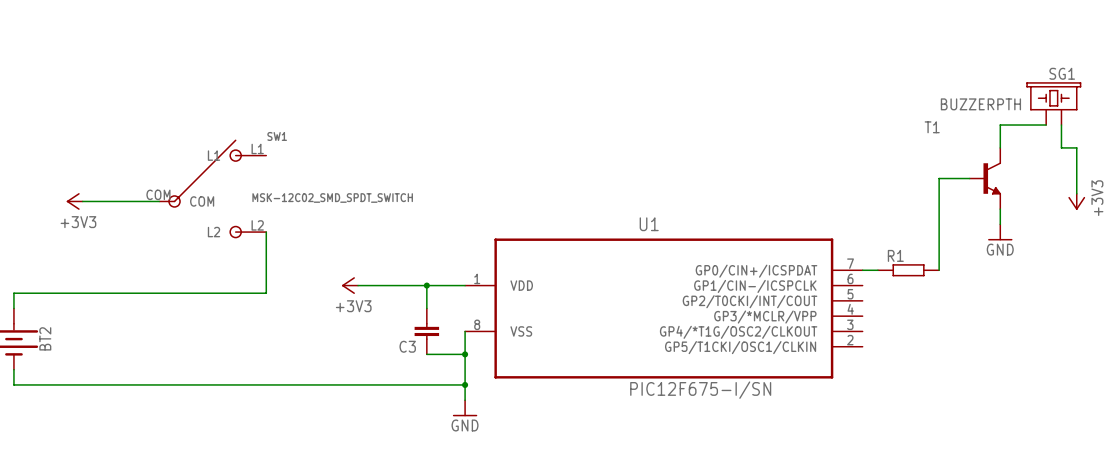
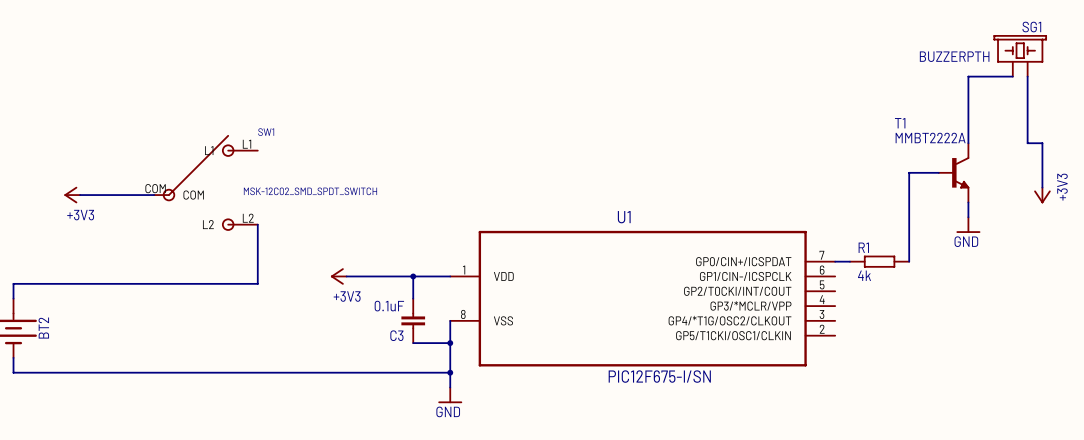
SG1 position: (1053, 103) -> (1020, 55)
wire: (1000, 125) (1046, 125) -> (968, 121) (968, 76) (1012, 76)
T1 value: none -> MMBT2222A (930, 137)
R1 value: none -> 4k (864, 275)
C3 value: none -> 0.1uF (389, 306)

